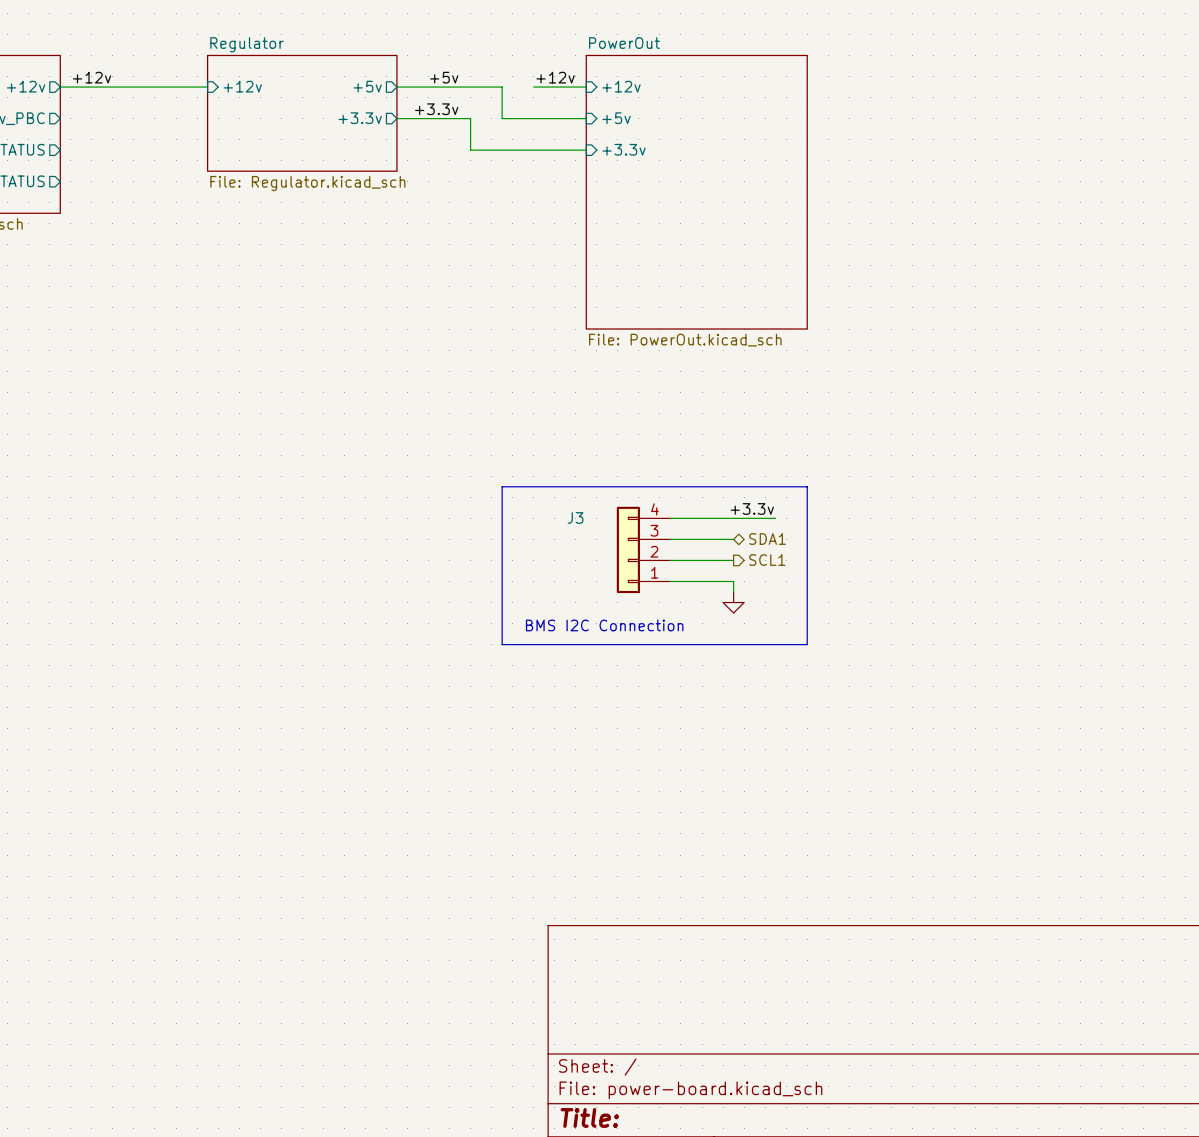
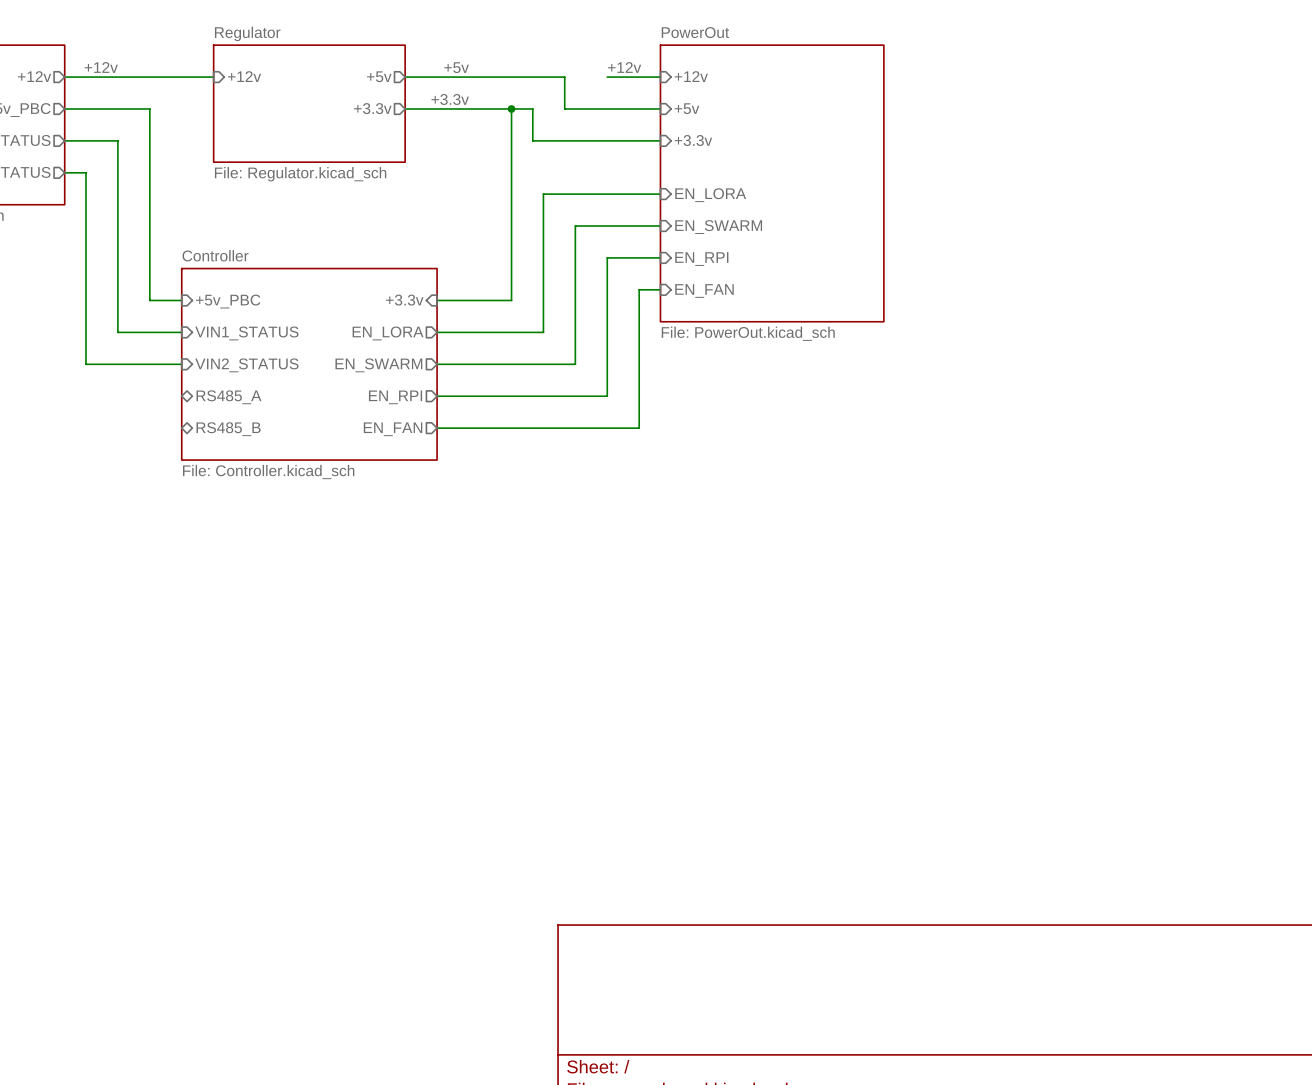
label position: +12v (555, 77) -> +12v (624, 67)
sheet pin position: +12v (621, 86) -> +12v (691, 76)
wire: (502, 87) (502, 118) -> (511, 77) (543, 77)
wire: (554, 87) (586, 87) -> (564, 77) (564, 108)
wire: none -> (607, 77) (660, 77)
wire: none -> (64, 108) (149, 108) (149, 300) (181, 300)
wire: (470, 118) (470, 150) (523, 150) -> (479, 108) (511, 108) (511, 300) (437, 300)
junction: none -> (511, 108)
wire: (523, 118) (554, 118) -> (532, 108) (532, 140)
wire: none -> (596, 108) (660, 108)
sheet pin position: +5v (616, 118) -> +5v (687, 108)
sheet pin position: +3.3v (624, 149) -> +3.3v (693, 140)
wire: none -> (64, 140) (117, 140) (117, 332) (181, 332)
wire: none -> (596, 140) (660, 140)
wire: none -> (64, 172) (85, 172) (85, 364) (181, 364)
sheet PowerOut position: (696, 192) -> (772, 183)
wire: none -> (660, 194) (543, 194) (543, 332) (437, 332)
sheet pin: none -> EN_LORA (710, 195)
wire: none -> (660, 226) (575, 226) (575, 364) (437, 364)
sheet pin: none -> EN_SWARM (718, 227)
wire: none -> (660, 257) (607, 257) (607, 396) (437, 396)
sheet pin: none -> EN_RPI (701, 259)
wire: none -> (660, 289) (639, 289) (639, 428) (437, 428)
sheet pin: none -> EN_FAN (704, 290)
sheet pin: none -> +3.3v (404, 300)
sheet pin: none -> +5v_PBC (228, 301)
sheet pin: none -> VIN1_STATUS (246, 333)
sheet pin: none -> EN_LORA (388, 333)
sheet pin: none -> VIN2_STATUS (246, 365)
sheet Controller: none -> File: Controller.kicad_sch (309, 364)
sheet pin: none -> EN_SWARM (378, 365)
sheet pin: none -> RS485_A (228, 397)
sheet pin: none -> EN_RPI (395, 397)
sheet pin: none -> RS485_B (228, 429)
sheet pin: none -> EN_FAN (393, 429)
line: (502, 486) (807, 486) (807, 644) (502, 644) (502, 486) -> none
label: +3.3v (752, 508) -> none
wire: (670, 518) (775, 518) -> none
wire: (670, 539) (733, 539) -> none
hierarchical label: SDA1 (767, 539) -> none
J3: (643, 549) -> none
wire: (670, 560) (733, 560) -> none
hierarchical label: SCL1 (767, 560) -> none
wire: (670, 581) (733, 581) (733, 592) -> none
power symbol: (733, 602) -> none
text: BMS I2C Connection (604, 625) -> none

